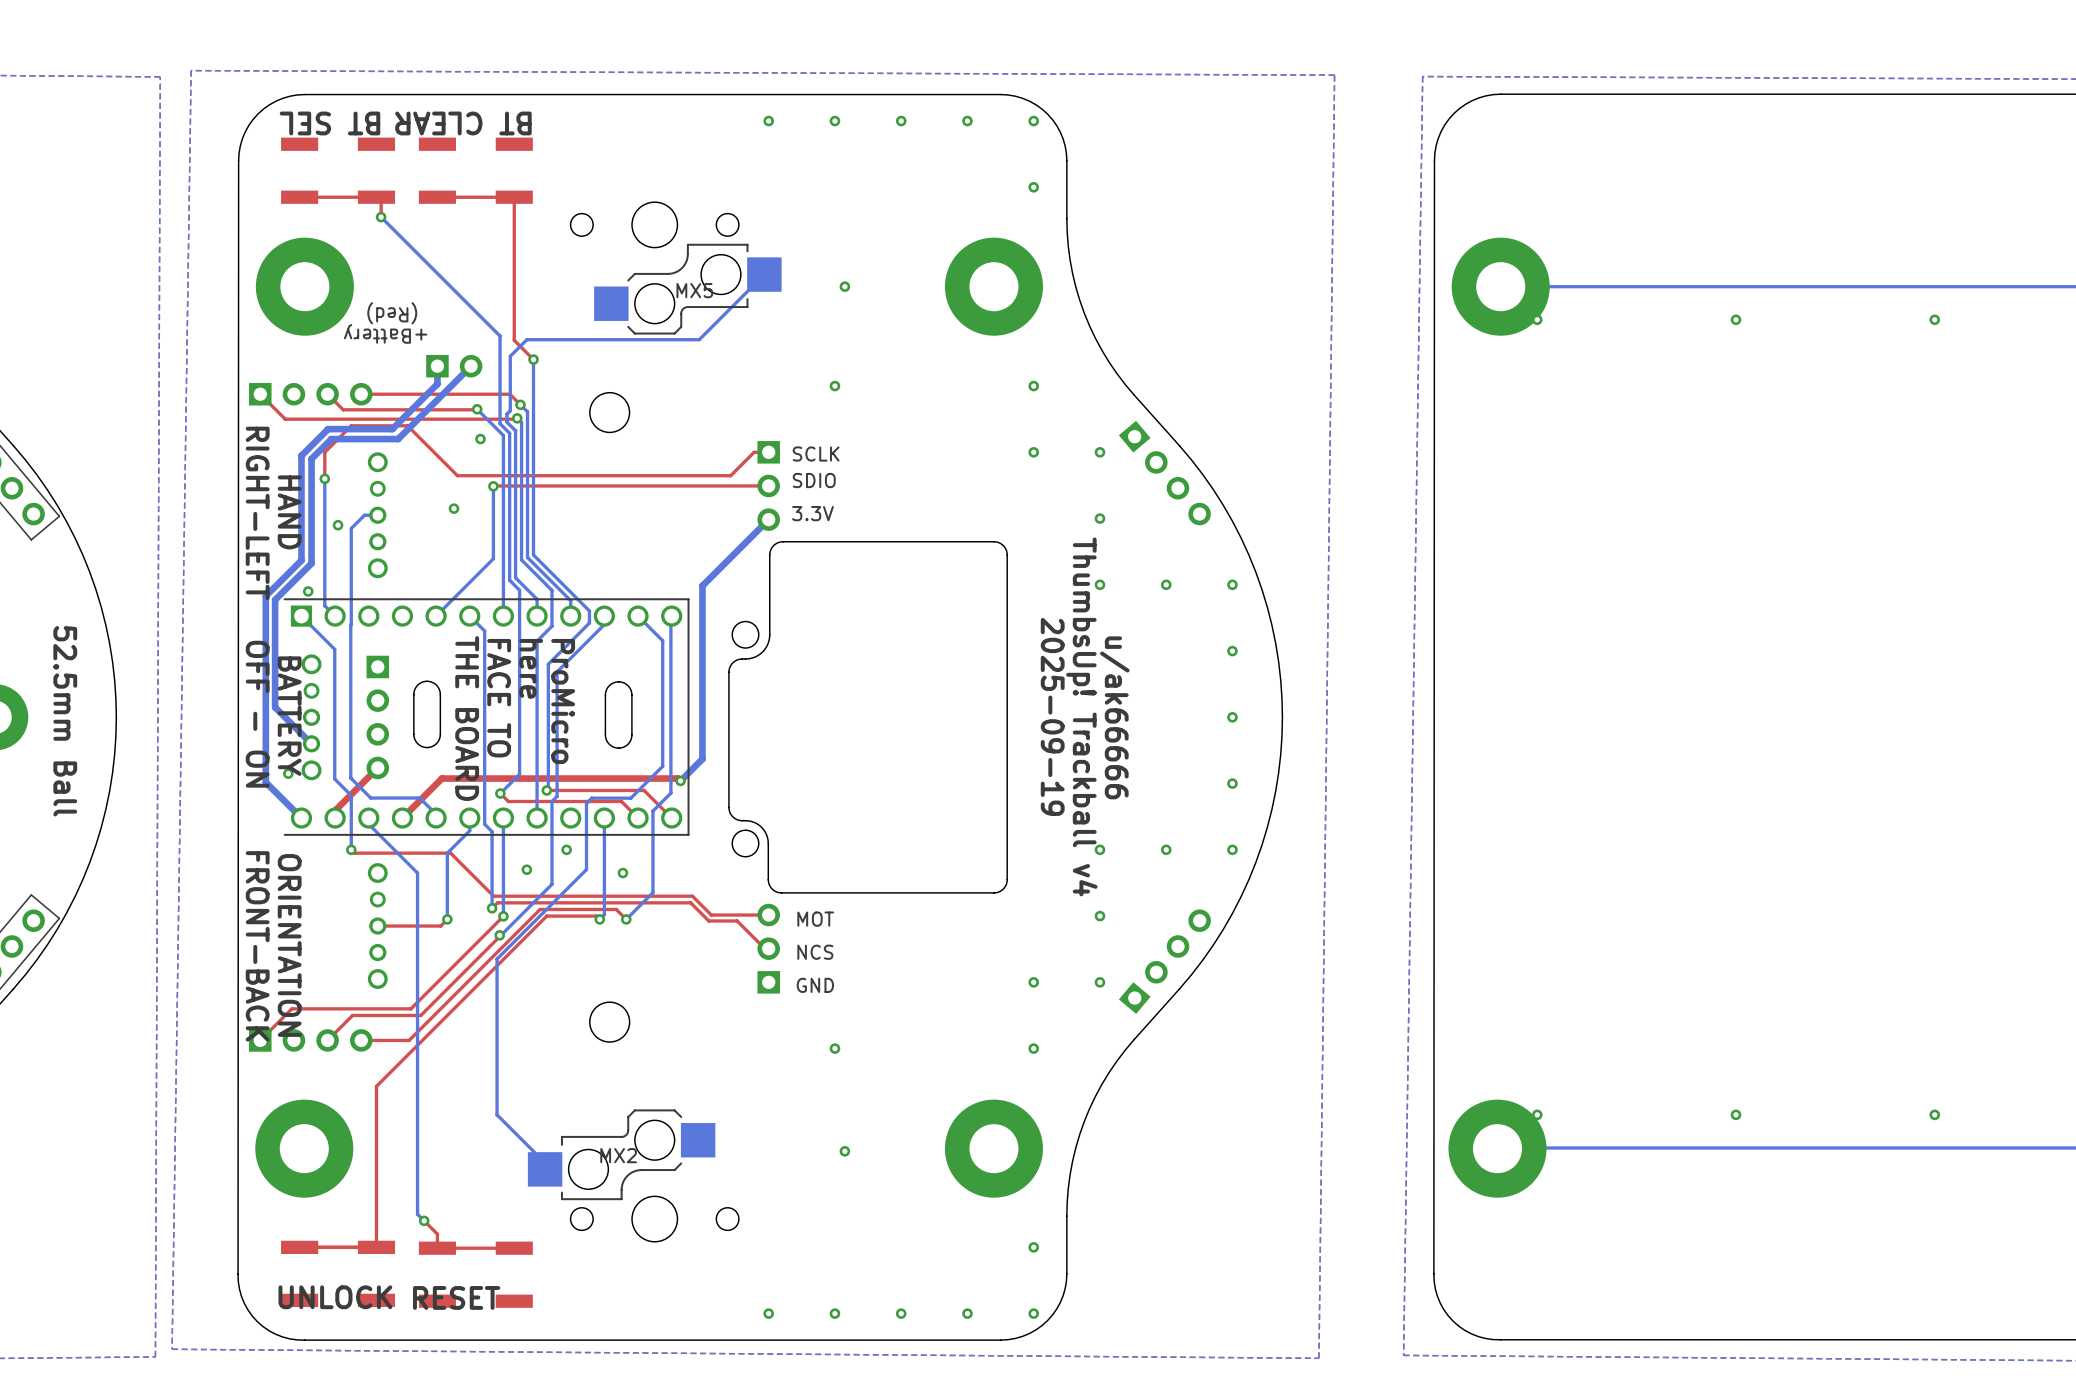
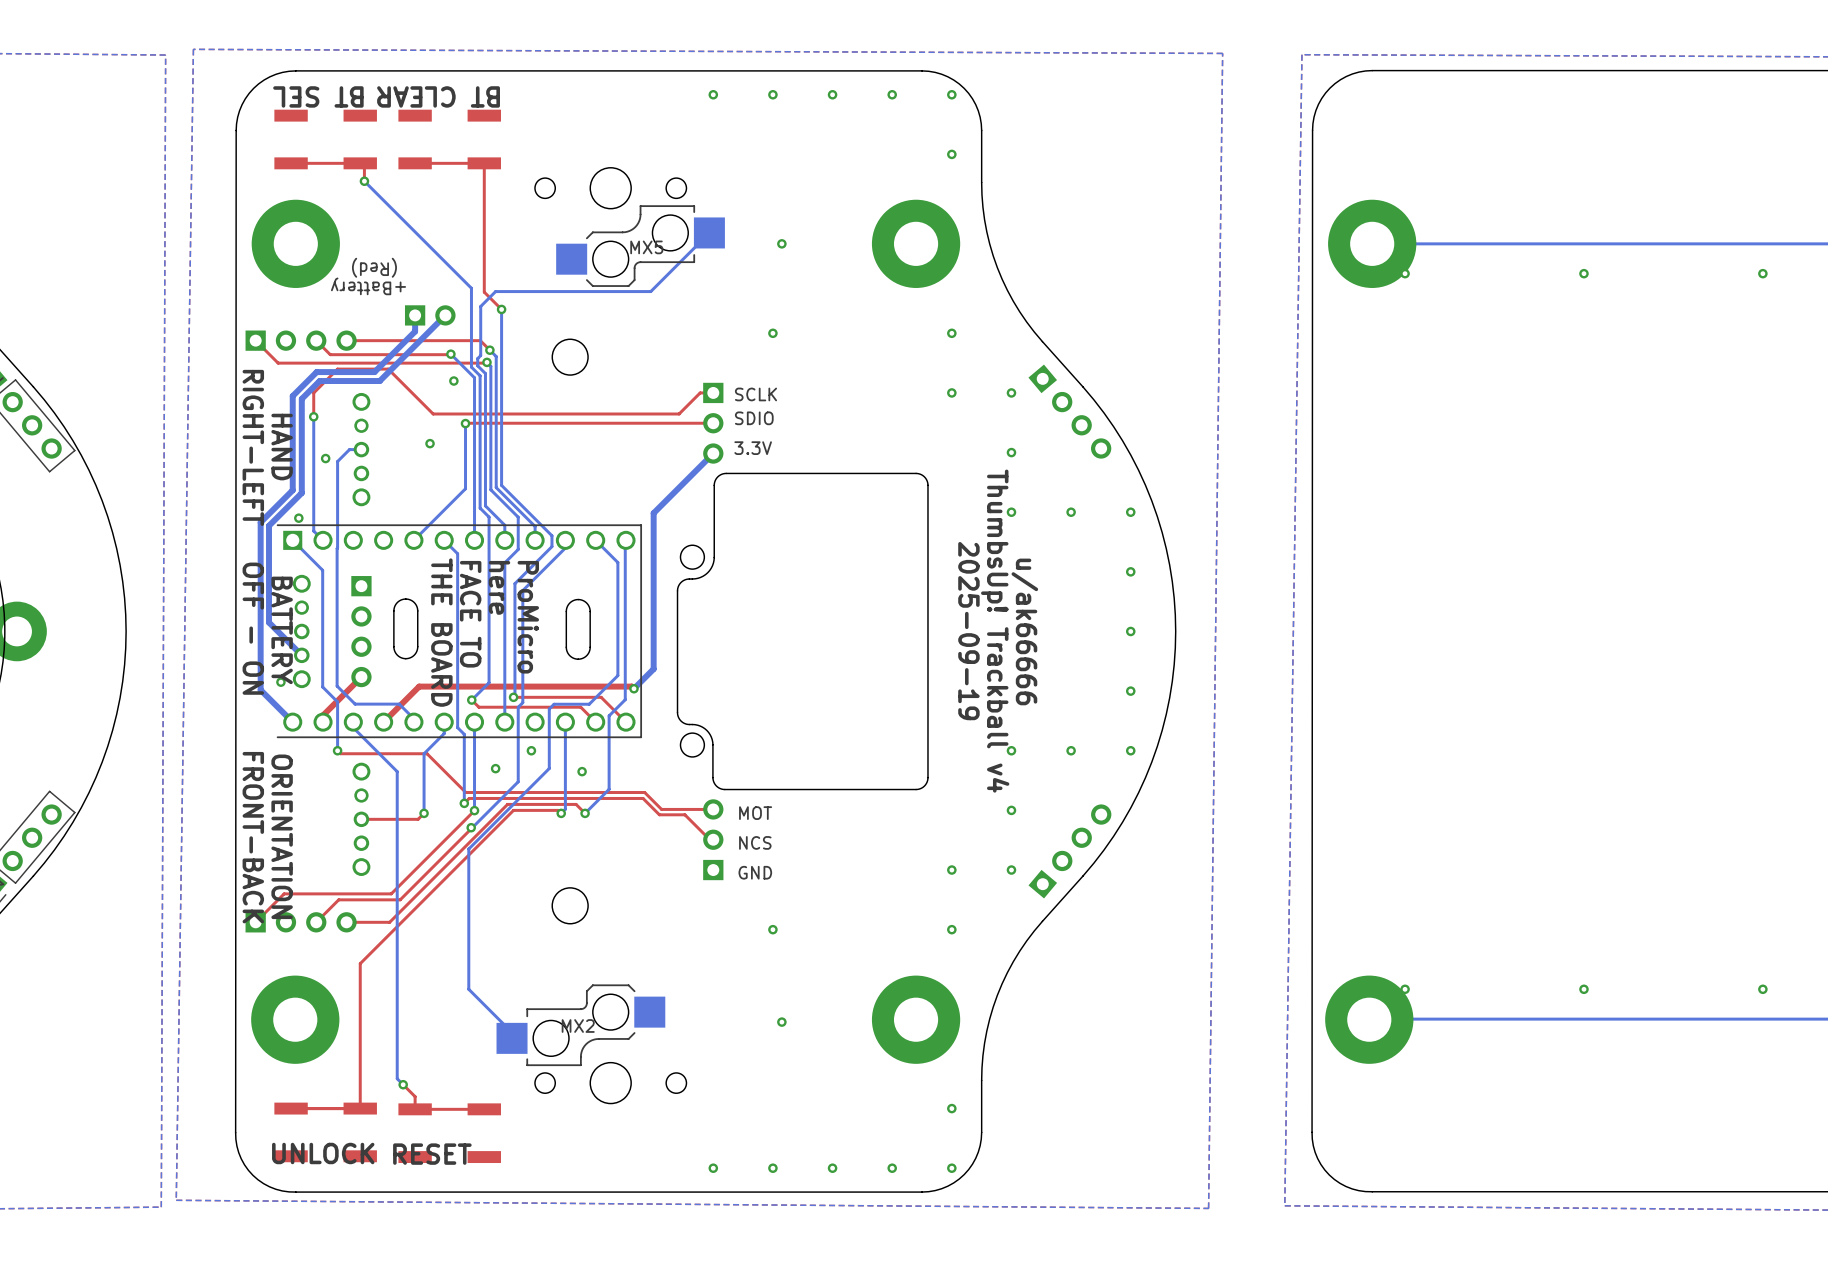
text: 52.5mm Ball (65, 721) -> none

